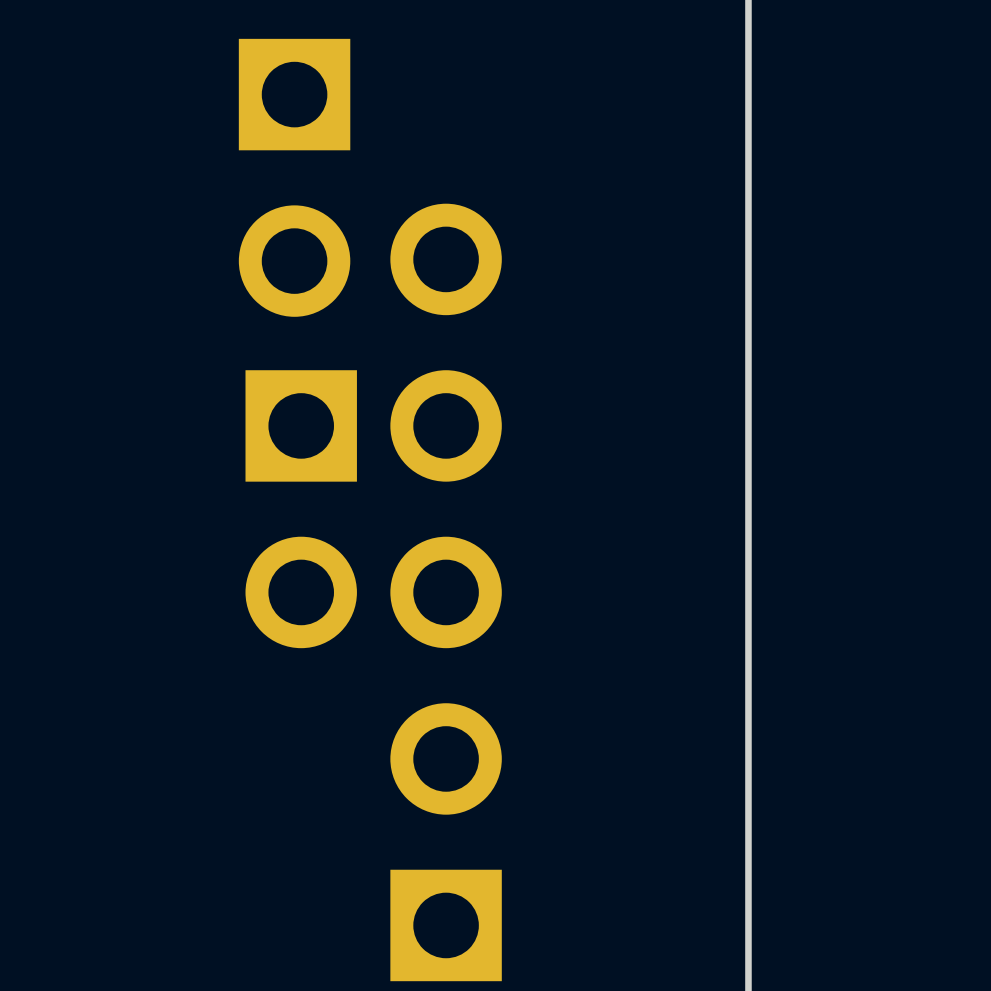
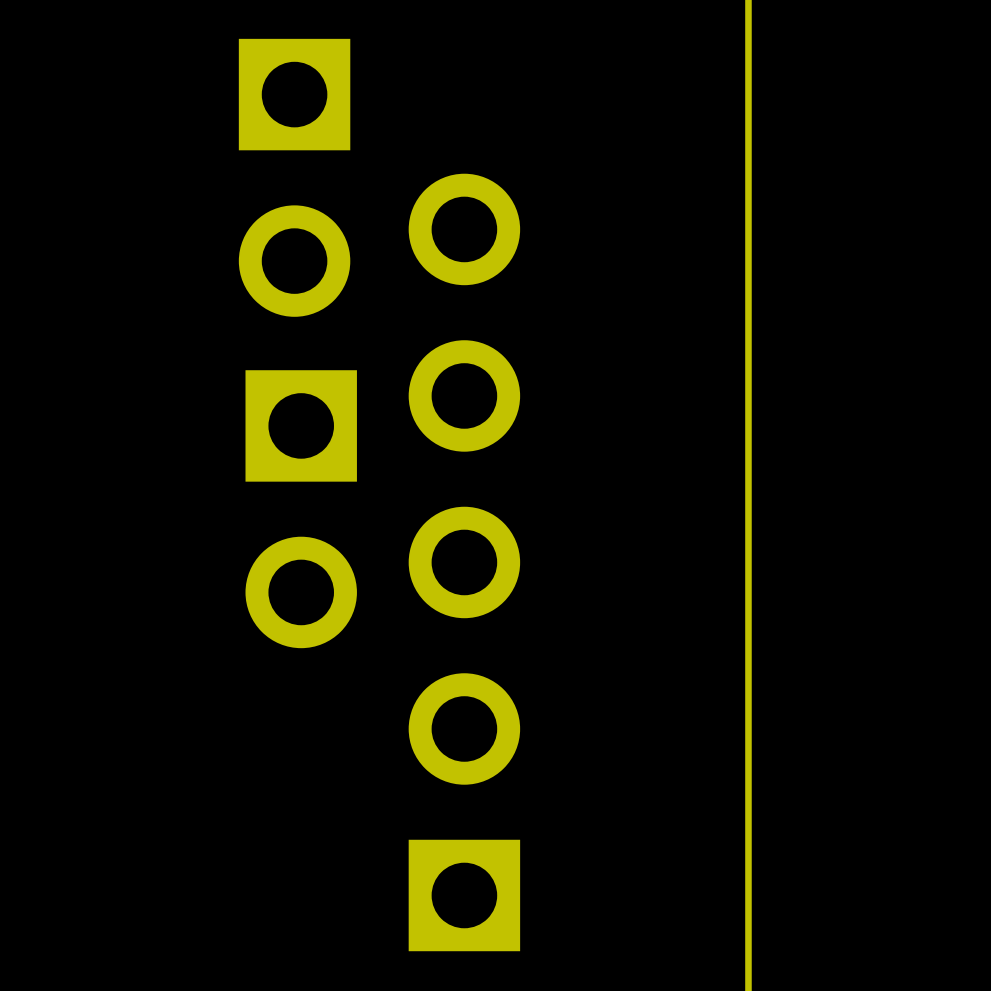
part position: (446, 592) -> (464, 562)

